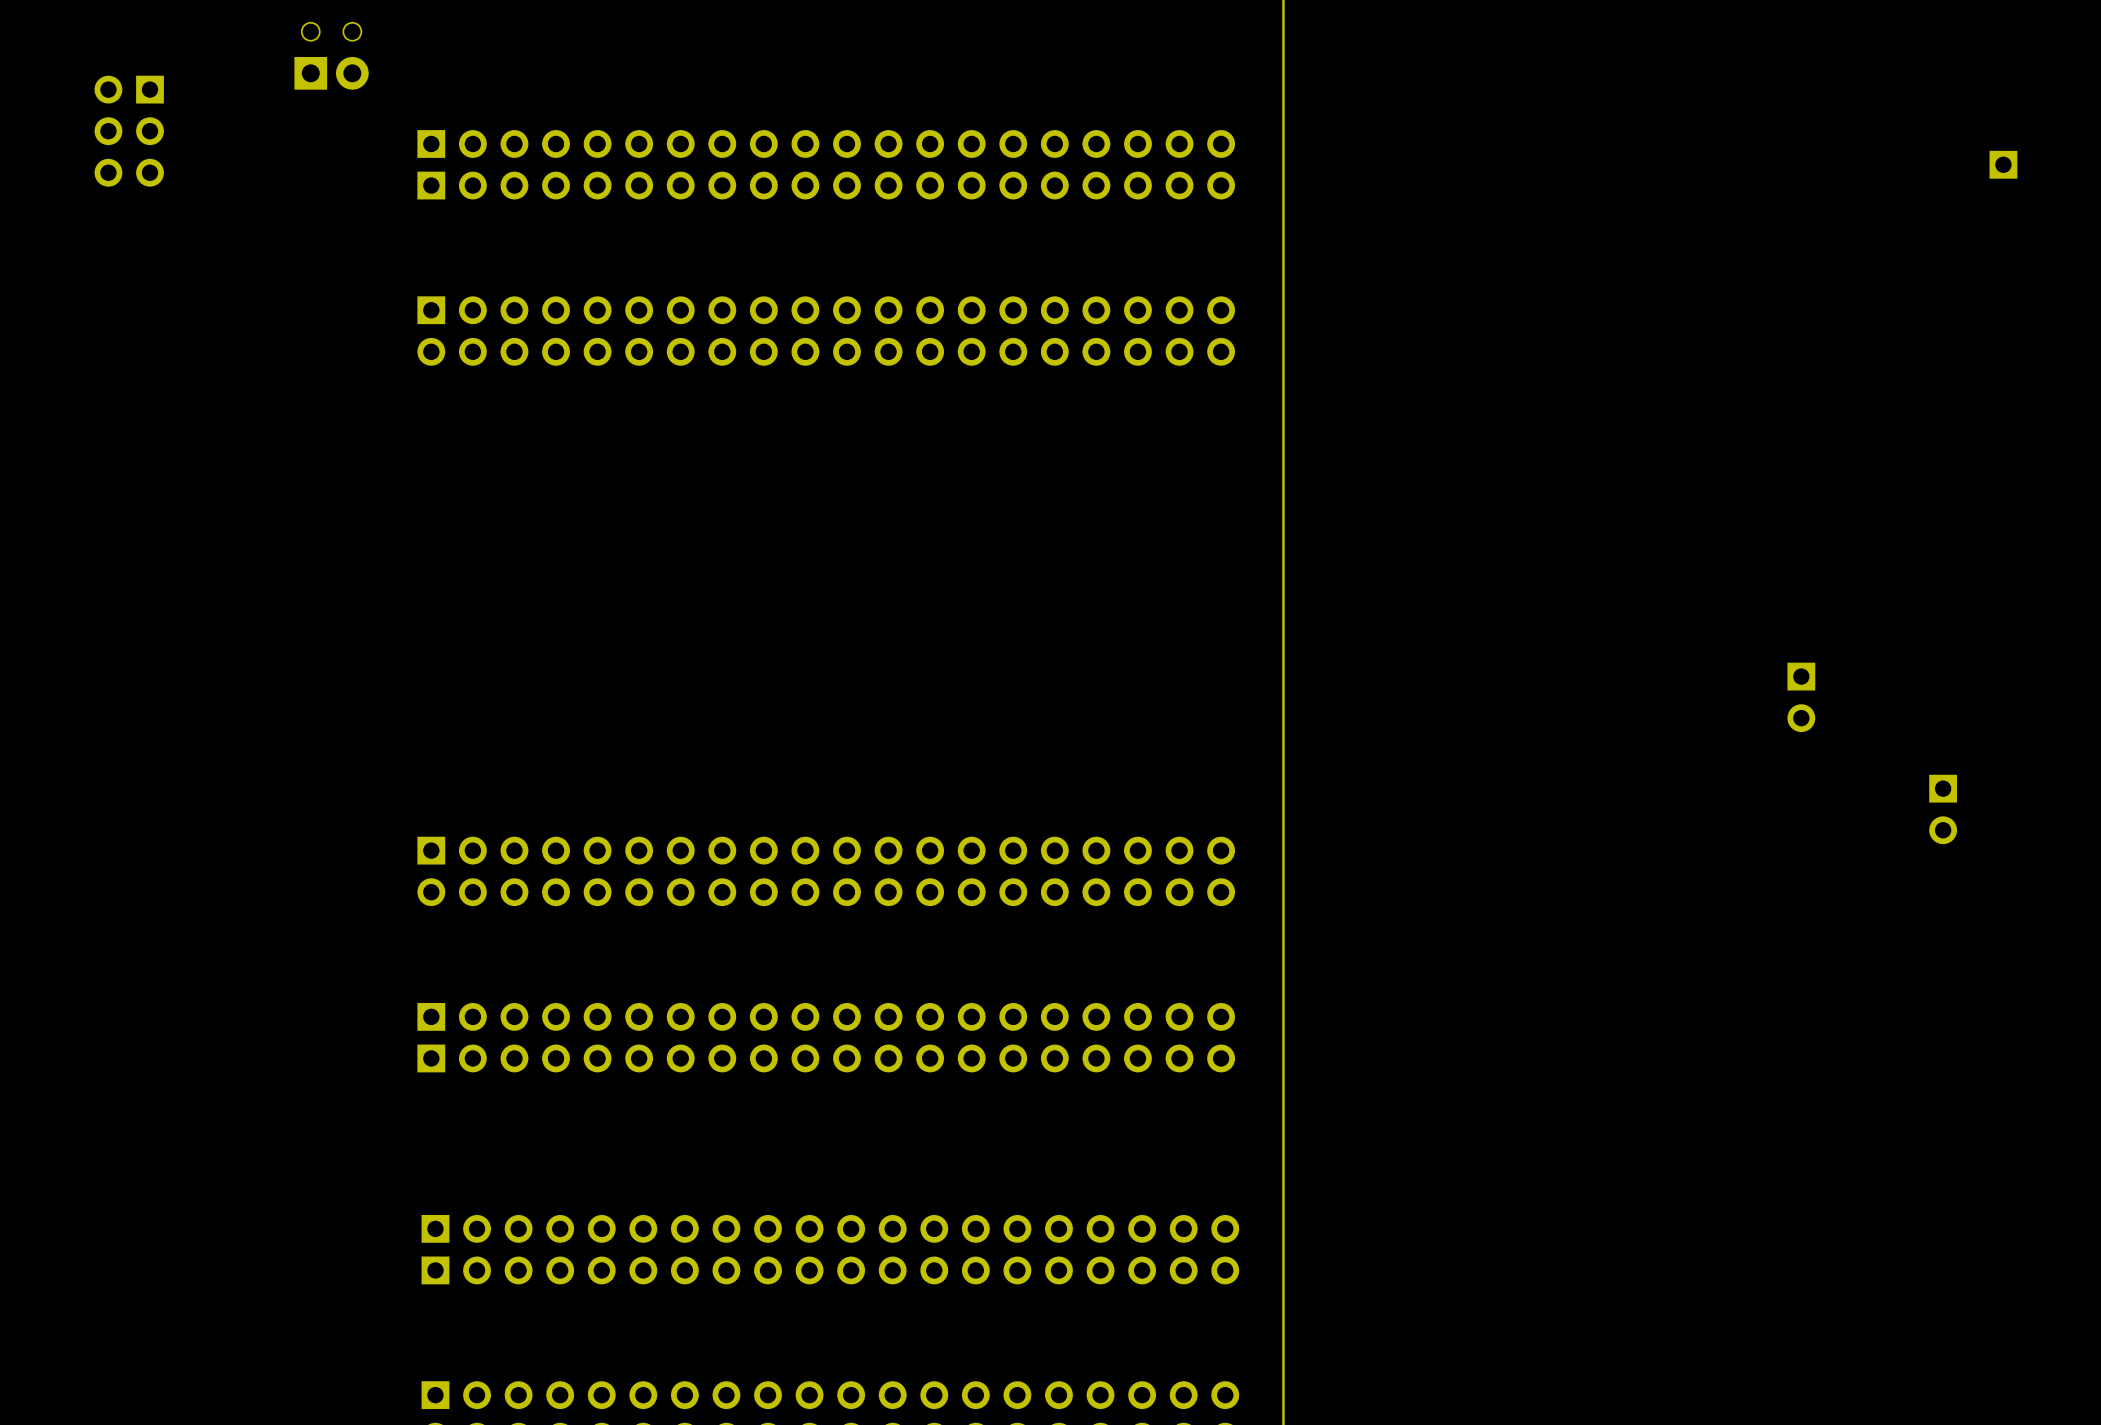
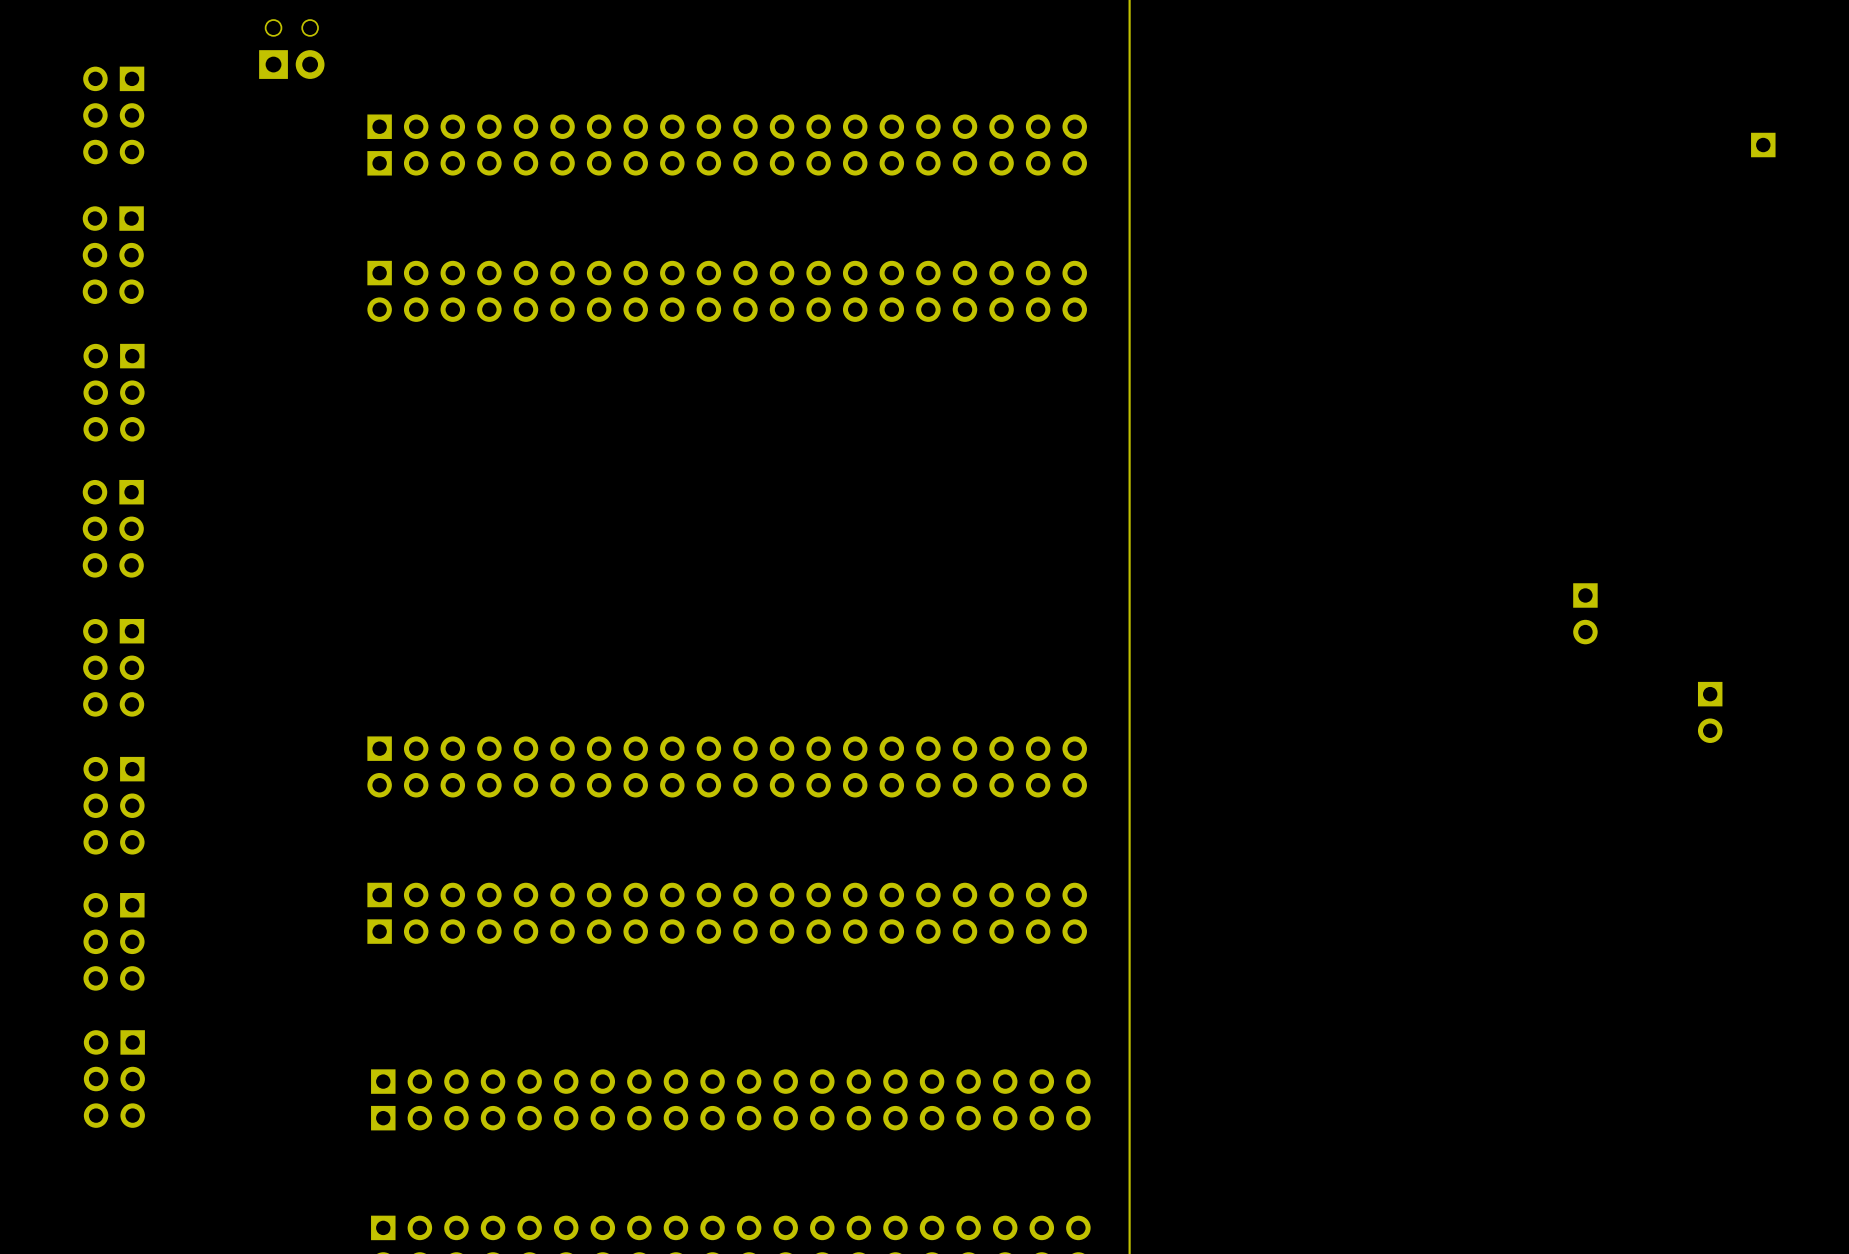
part: none -> (113, 255)
part: none -> (114, 392)
part: none -> (113, 528)
part: none -> (113, 667)
part: none -> (114, 805)
part: none -> (114, 941)
part: none -> (114, 1079)

